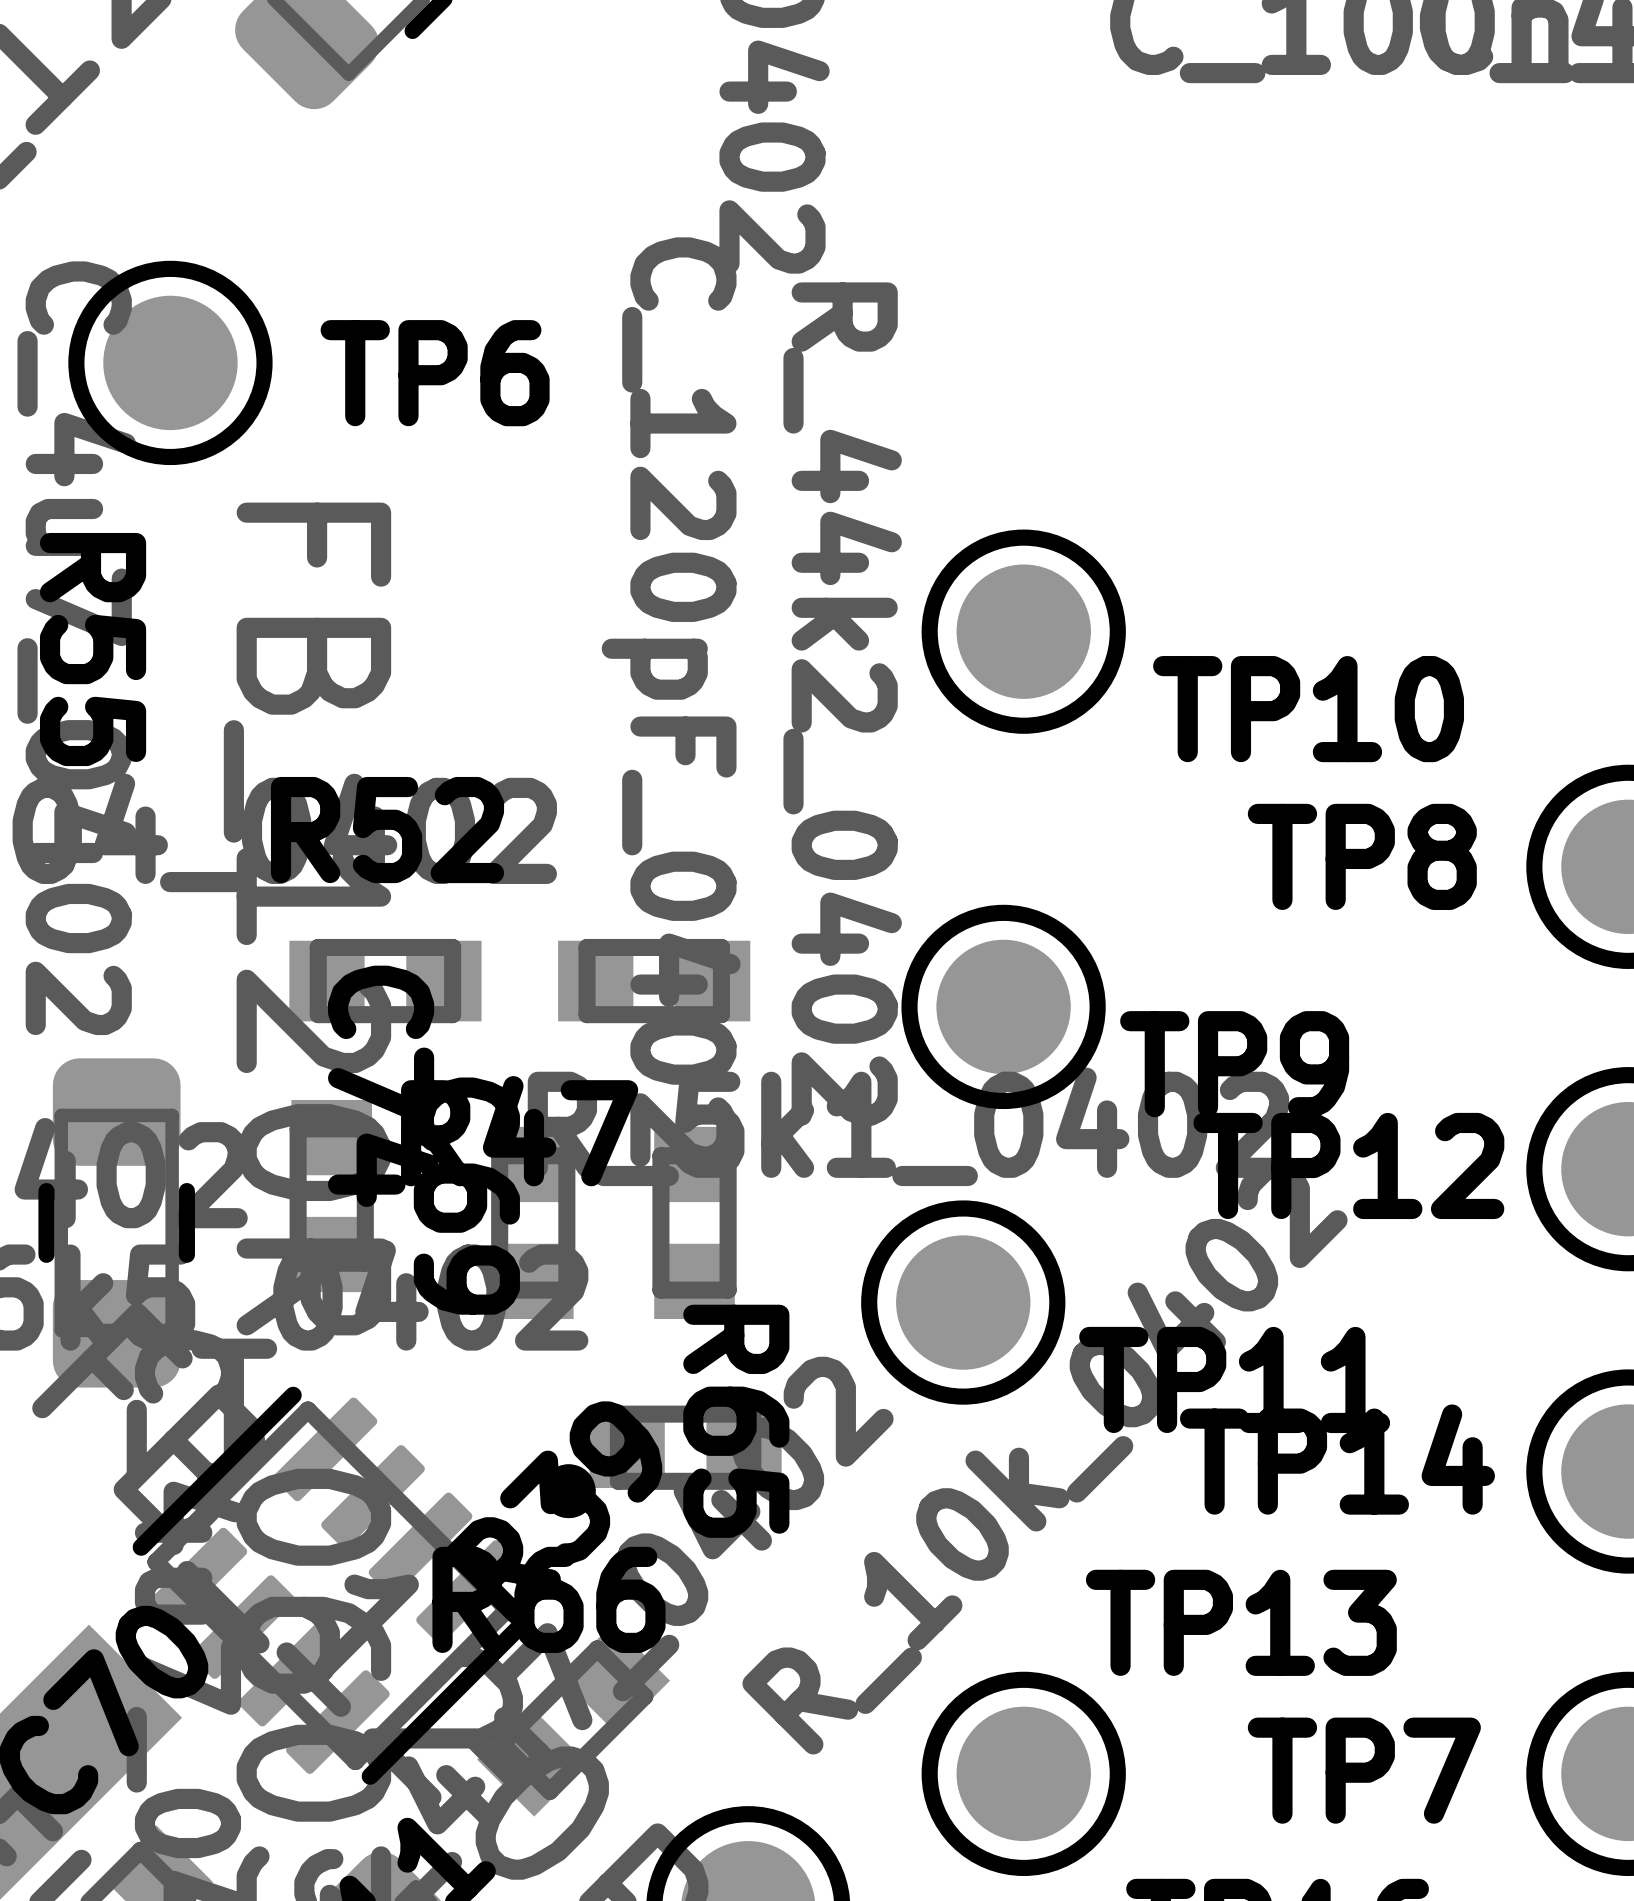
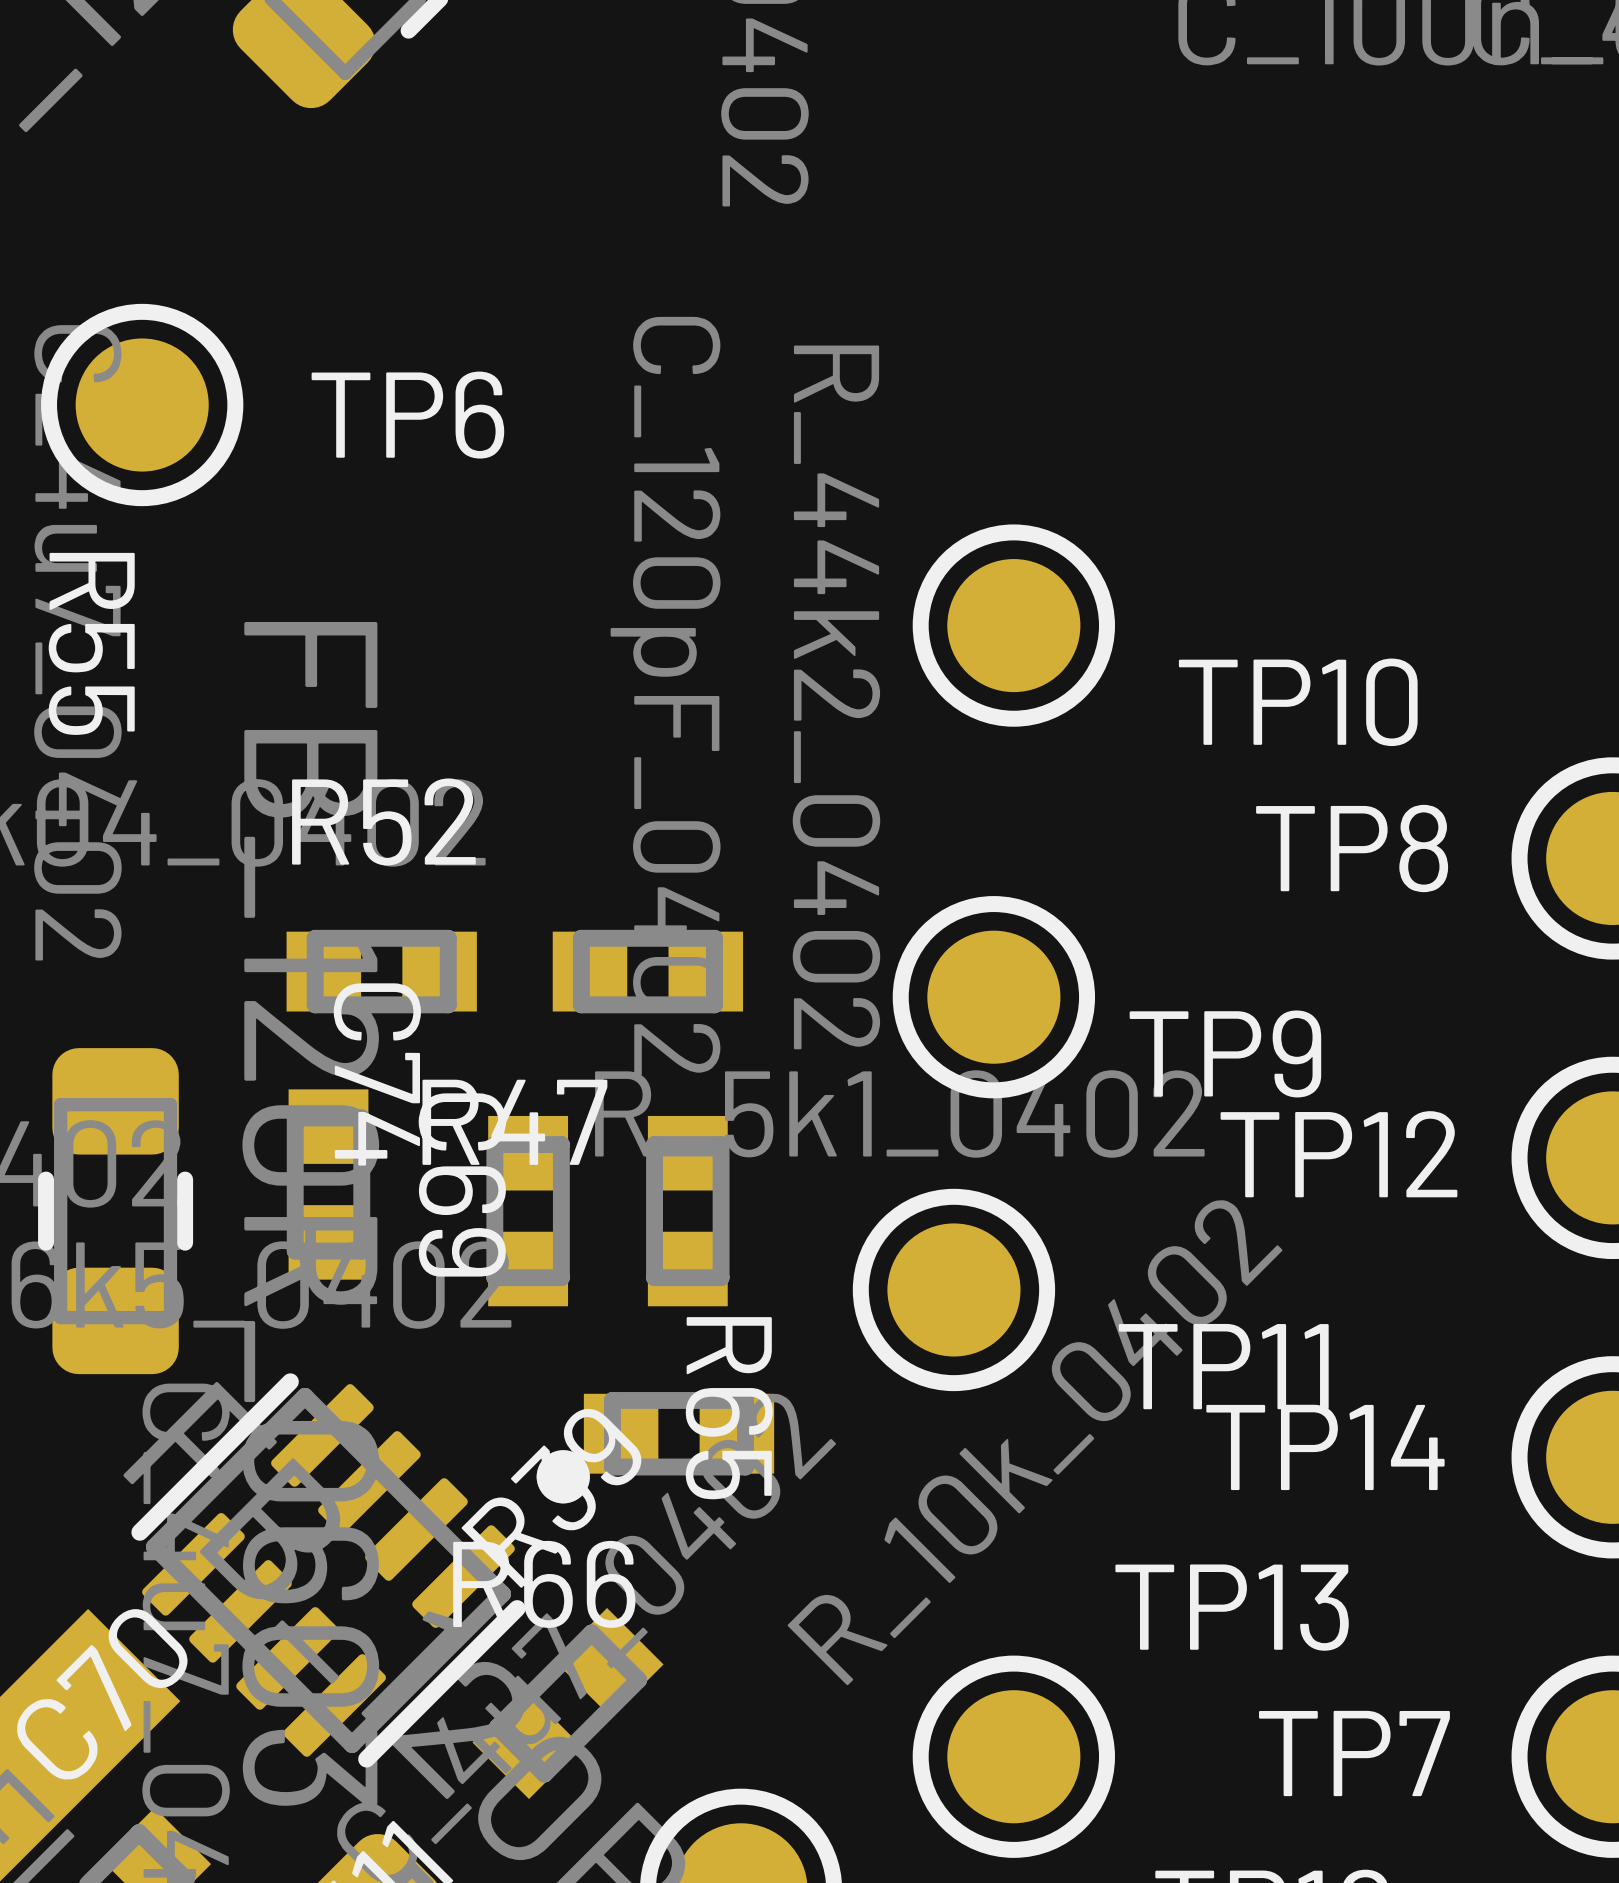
TP6 position: (170, 362) -> (142, 405)

